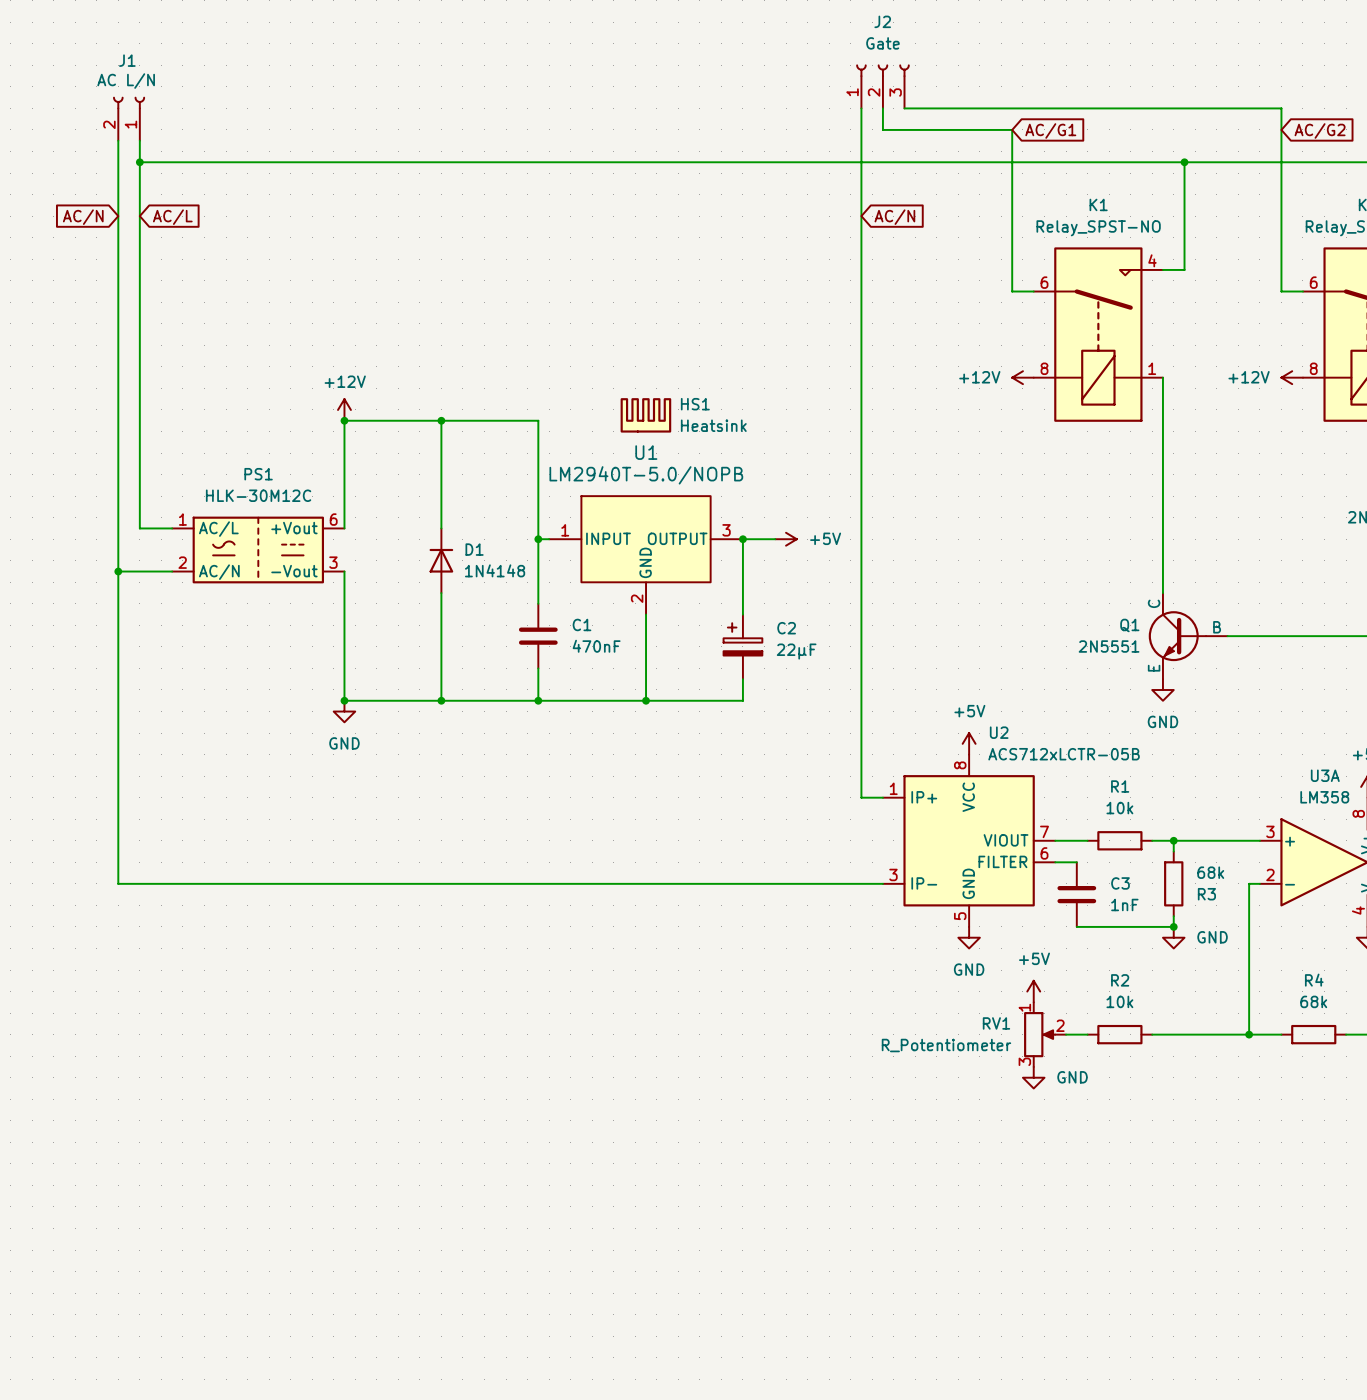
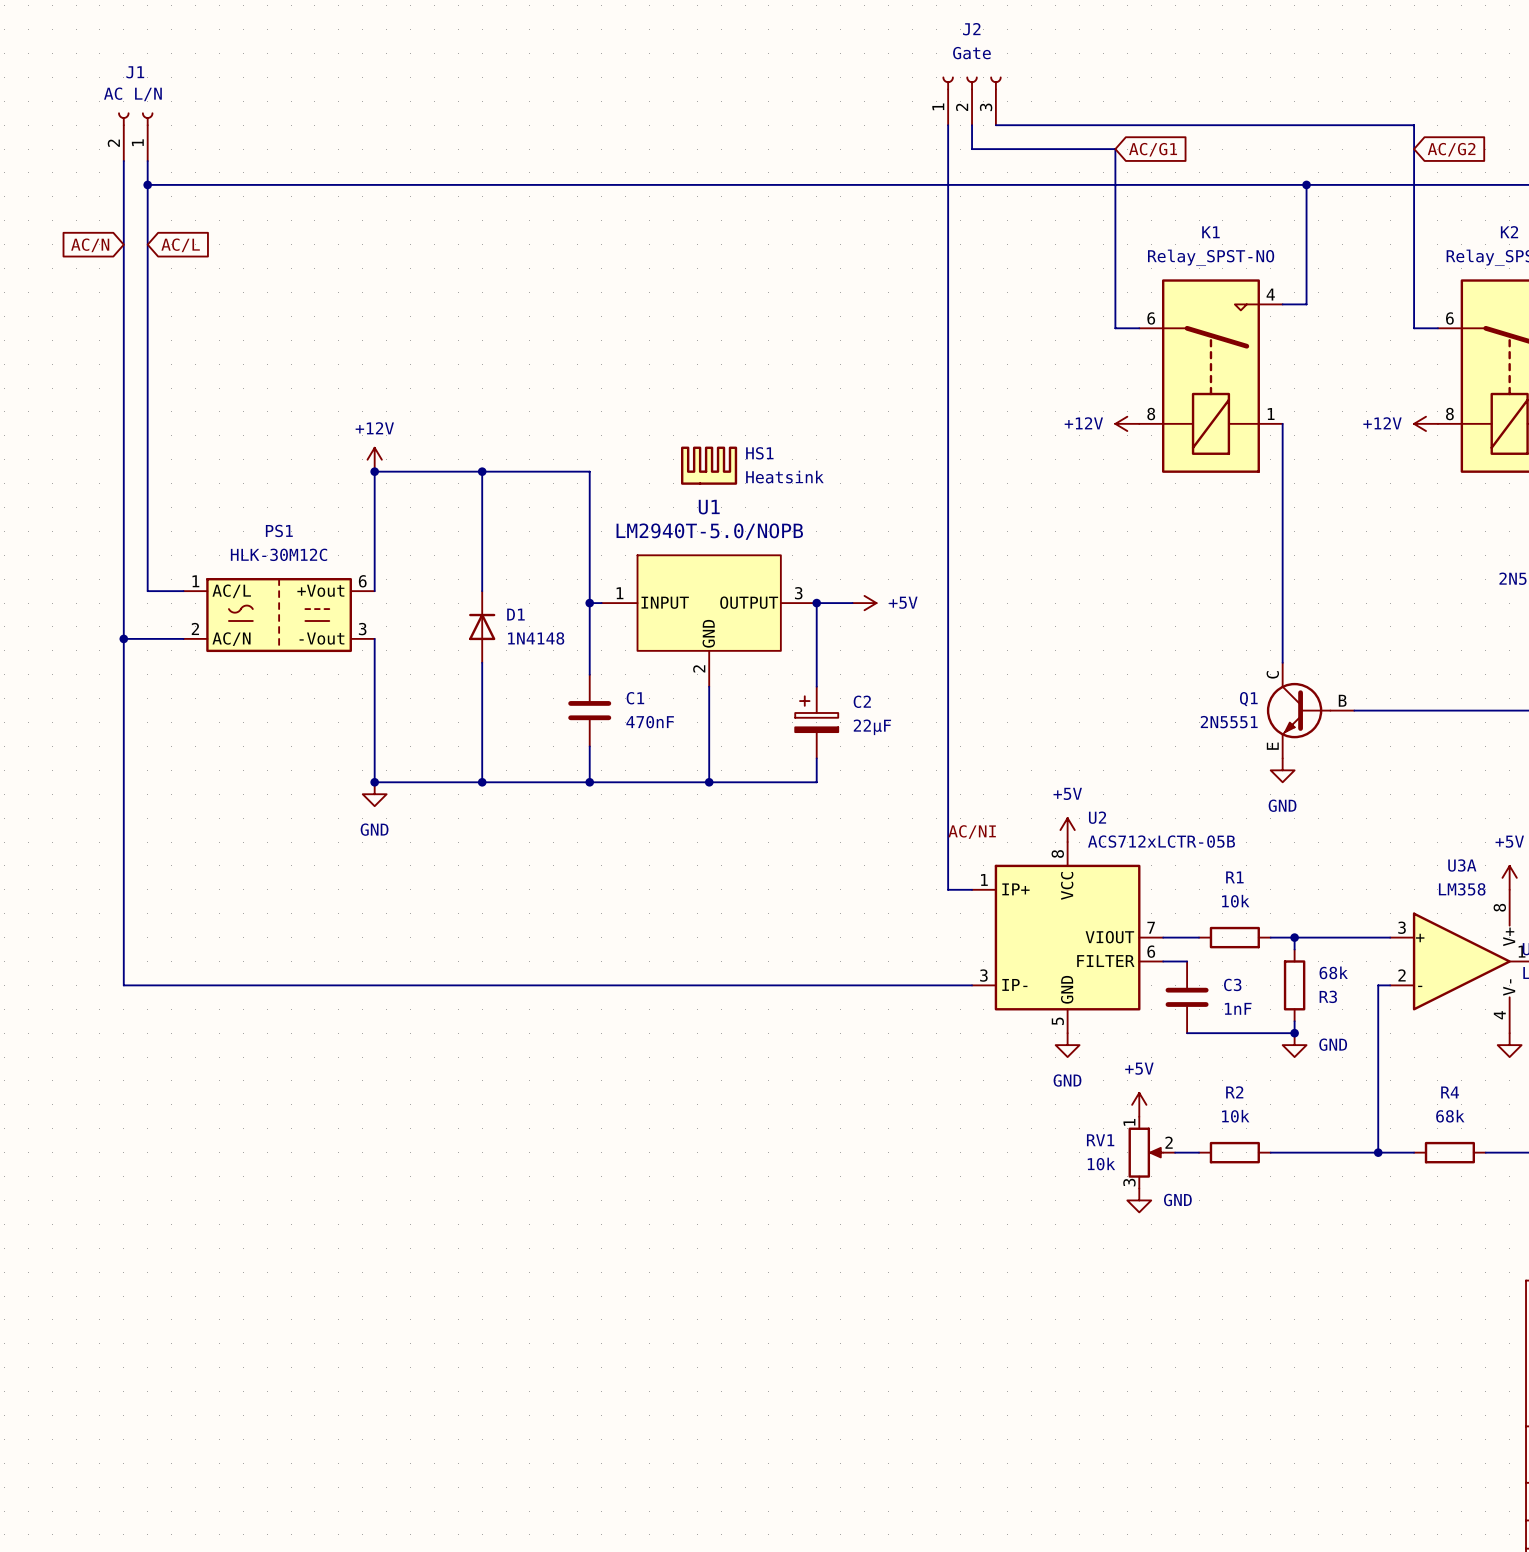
global label: AC/N (894, 217) -> none
label: none -> AC/NI (972, 832)
RV1 value: R_Potentiometer (946, 1045) -> 10k (1101, 1164)

